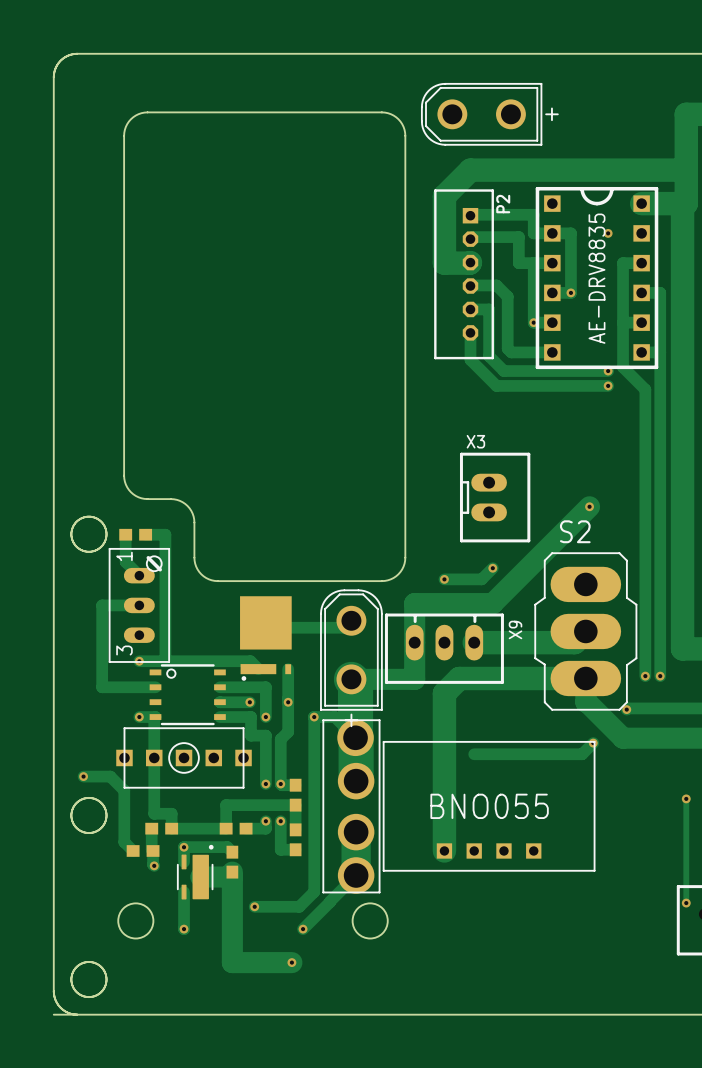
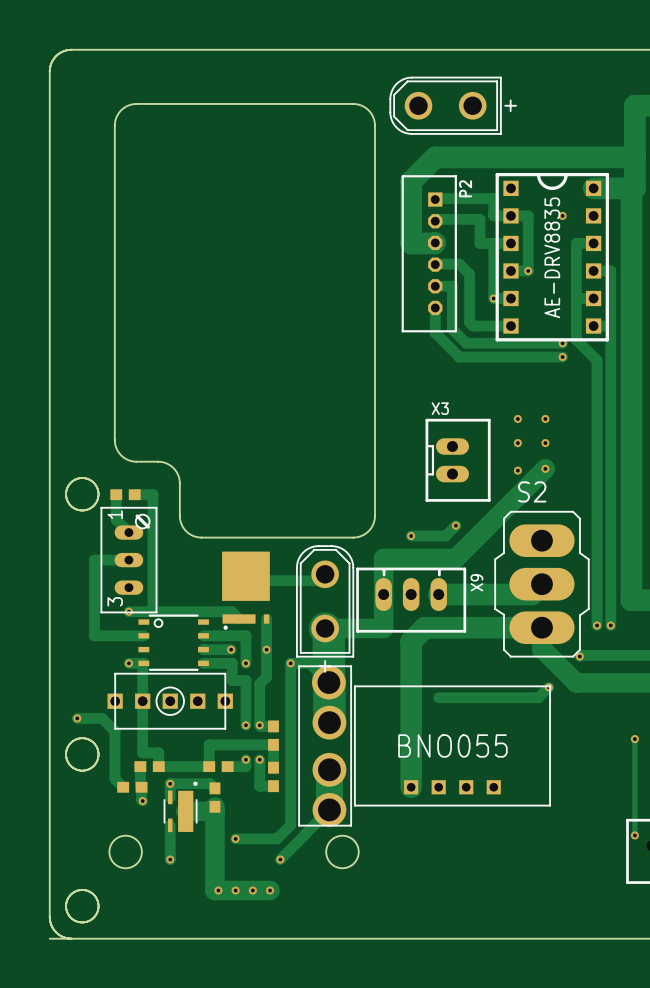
via: none -> (517, 418)
via: none -> (545, 418)
via: none -> (517, 443)
via: none -> (545, 443)
via: none -> (517, 470)
via: none -> (218, 890)
via: none -> (235, 890)
via: none -> (252, 890)

